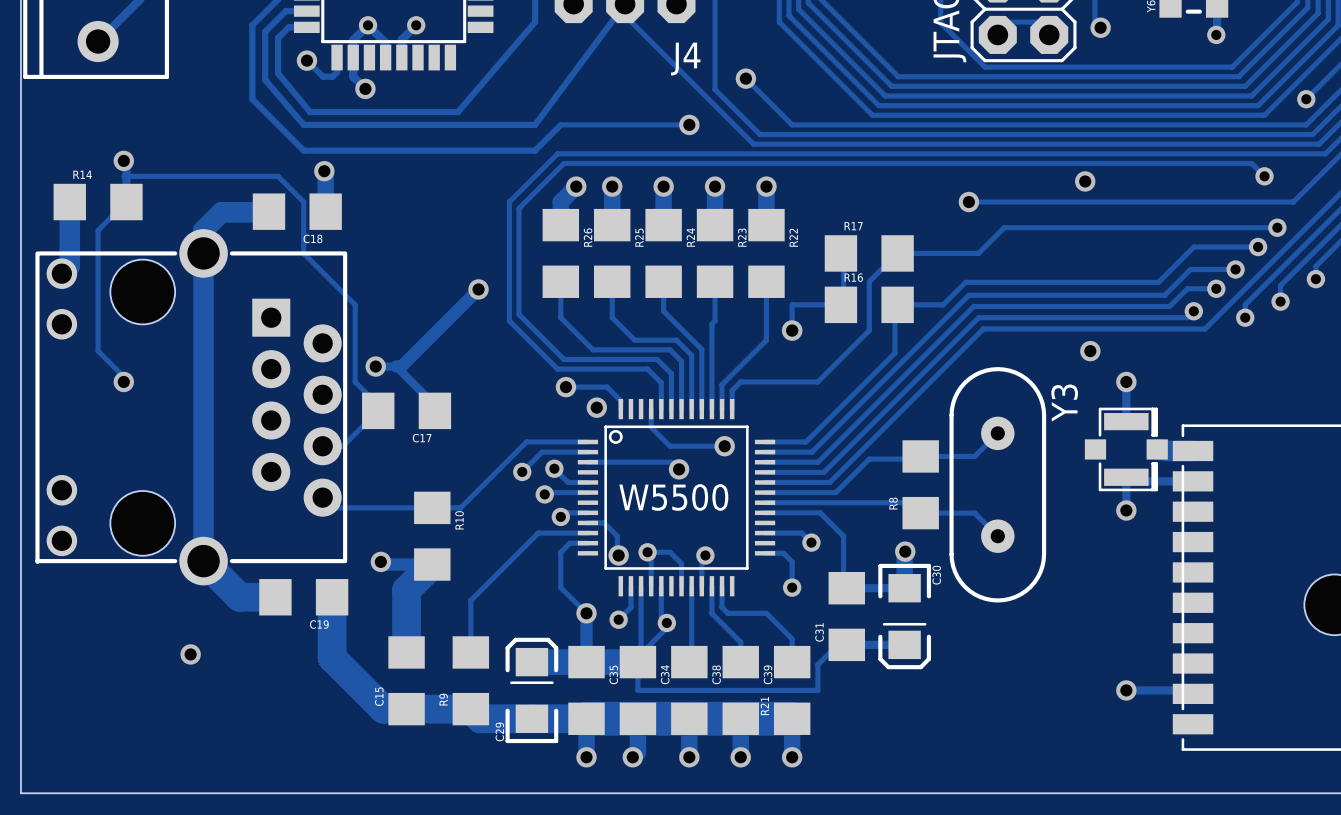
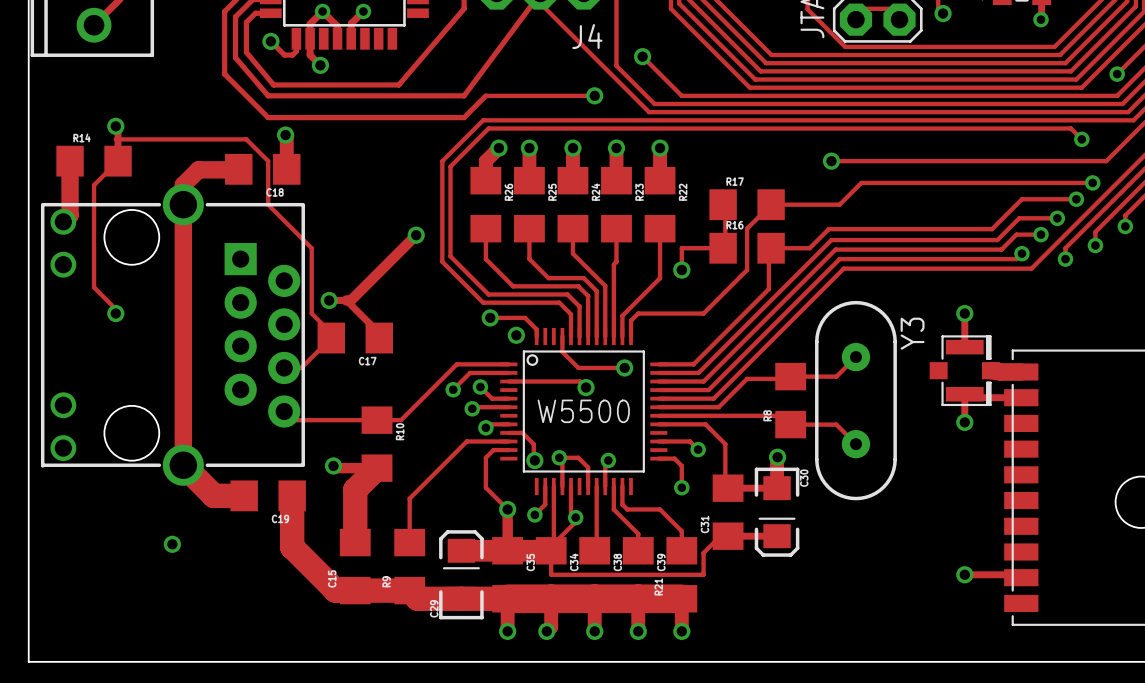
via: (1085, 181) -> none
via: (1090, 351) -> none

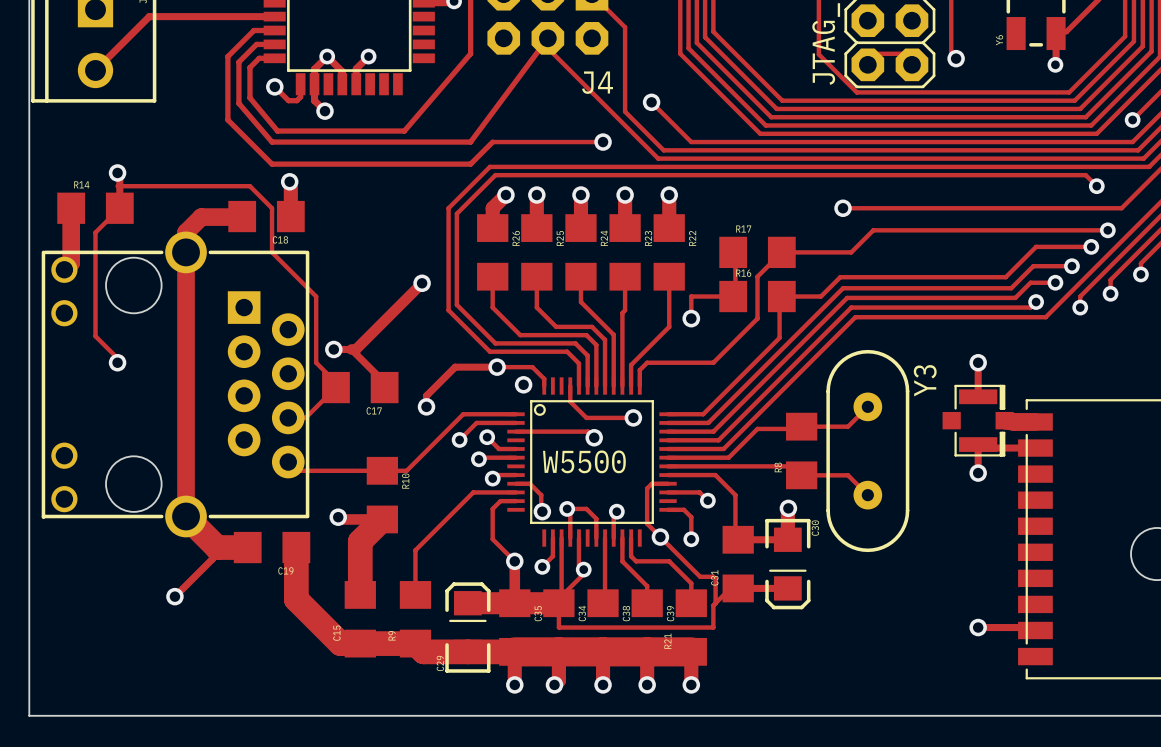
track: none -> (497, 367) (455, 367) (426, 395) (426, 406)
via: none -> (426, 406)
track: none -> (668, 483) (651, 483) (647, 488) (647, 523) (700, 576) (713, 576) (715, 578) (715, 603)
via: none -> (660, 537)
track: none -> (212, 543) (212, 559) (174, 596)

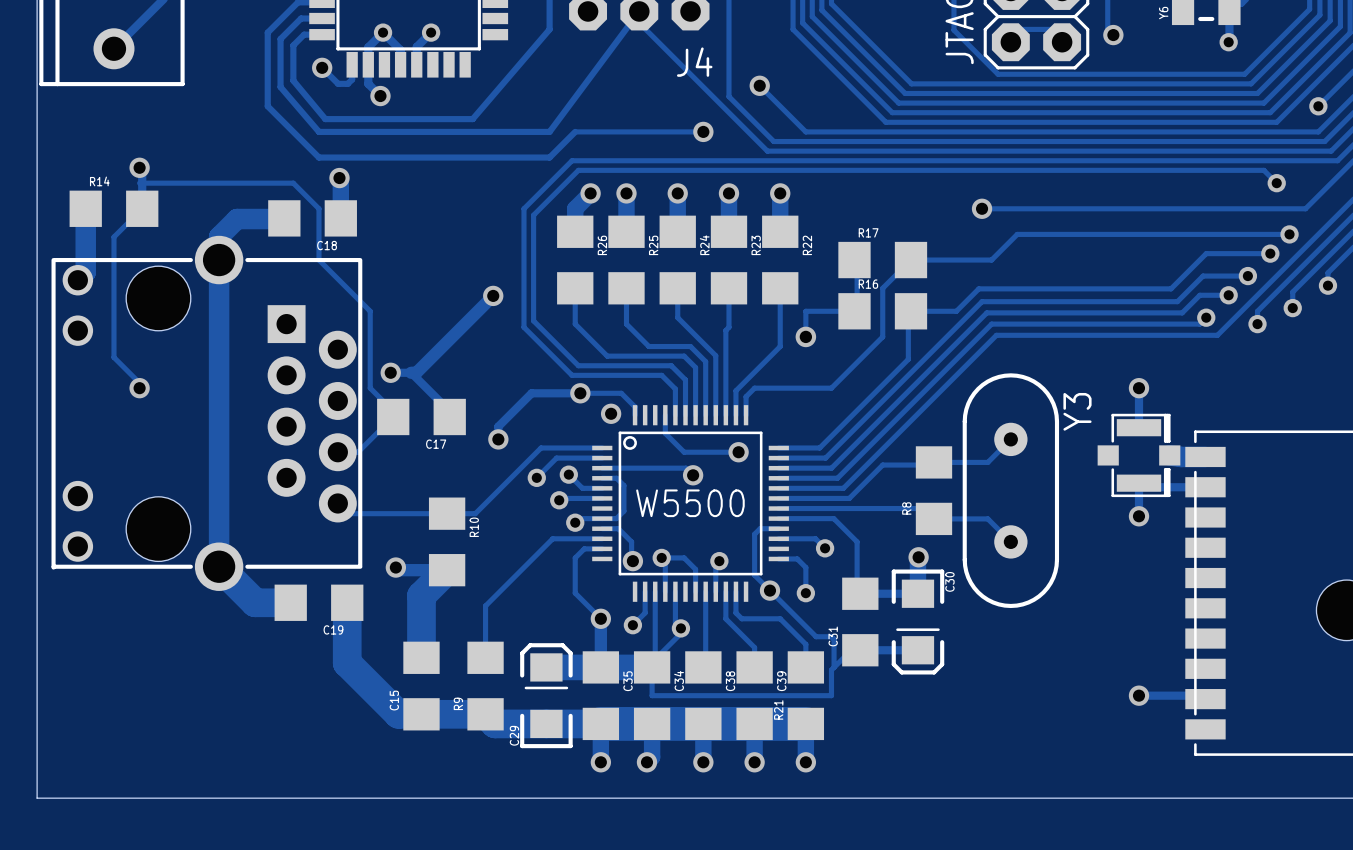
track: none -> (602, 478) (616, 478) (623, 485) (623, 511) (616, 518) (602, 518)
track: (212, 543) (212, 559) (174, 596) -> none
via: (174, 596) -> none

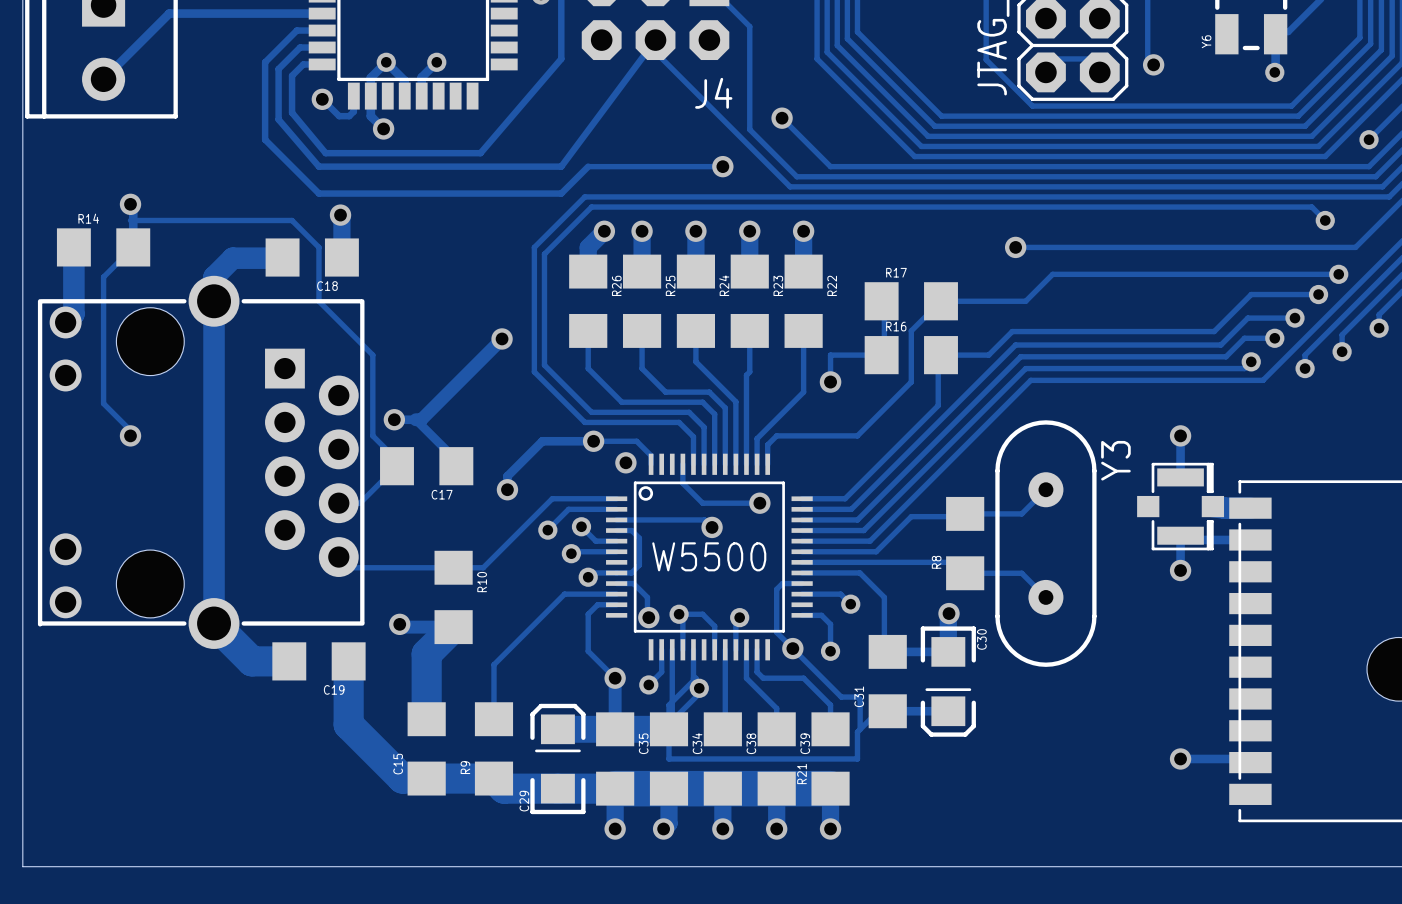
track: none -> (693, 678) (695, 678) (668, 705) (668, 729)

